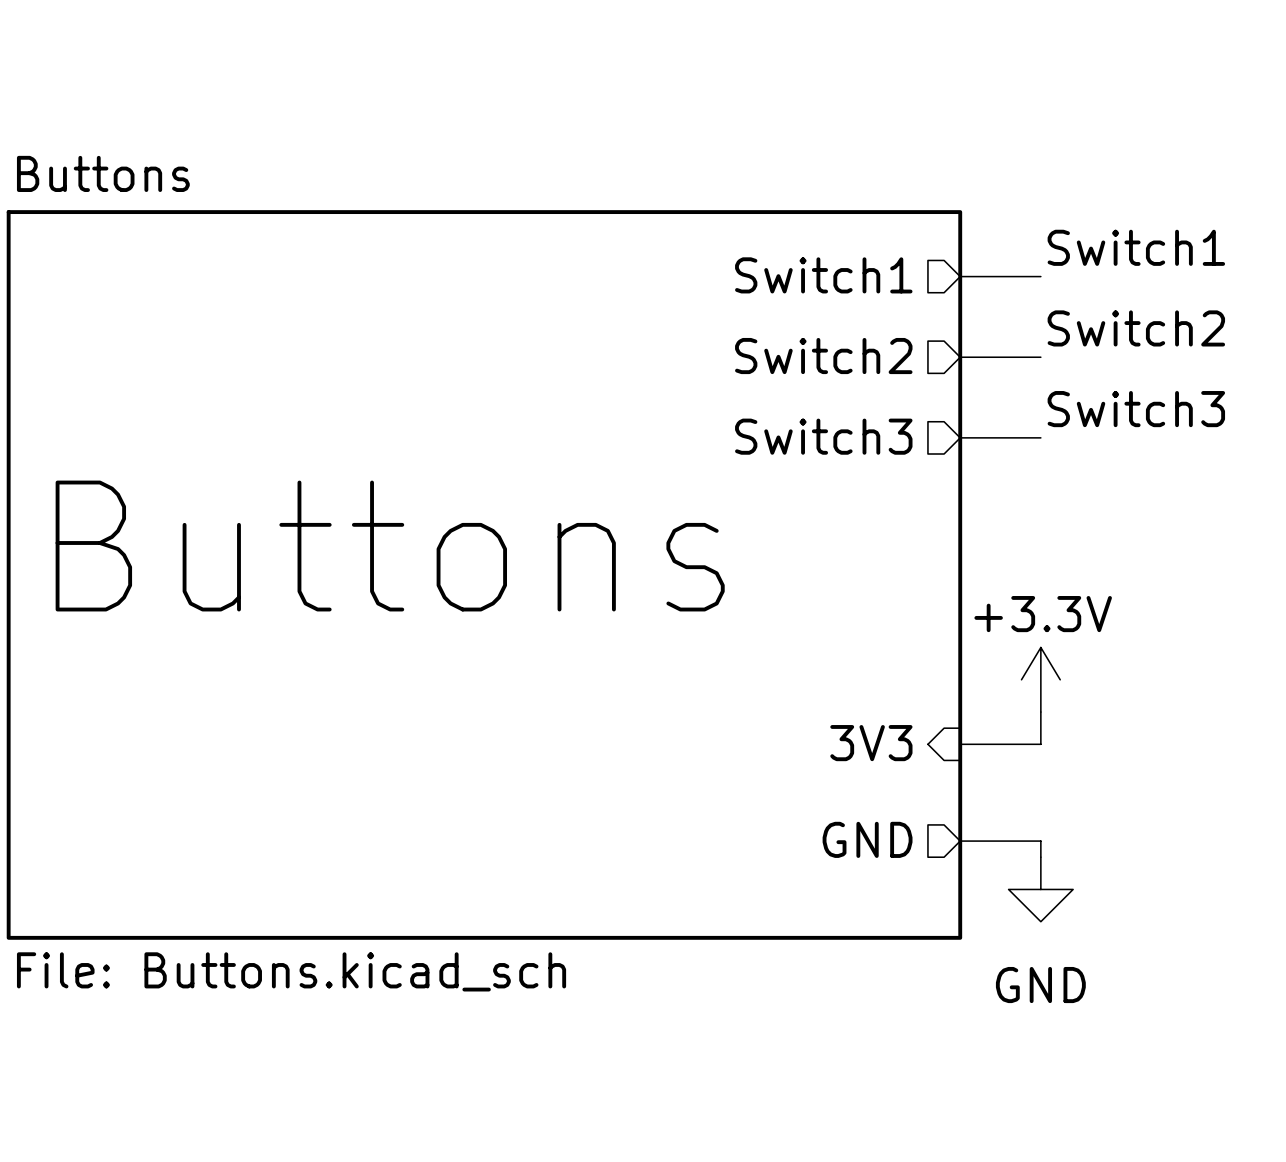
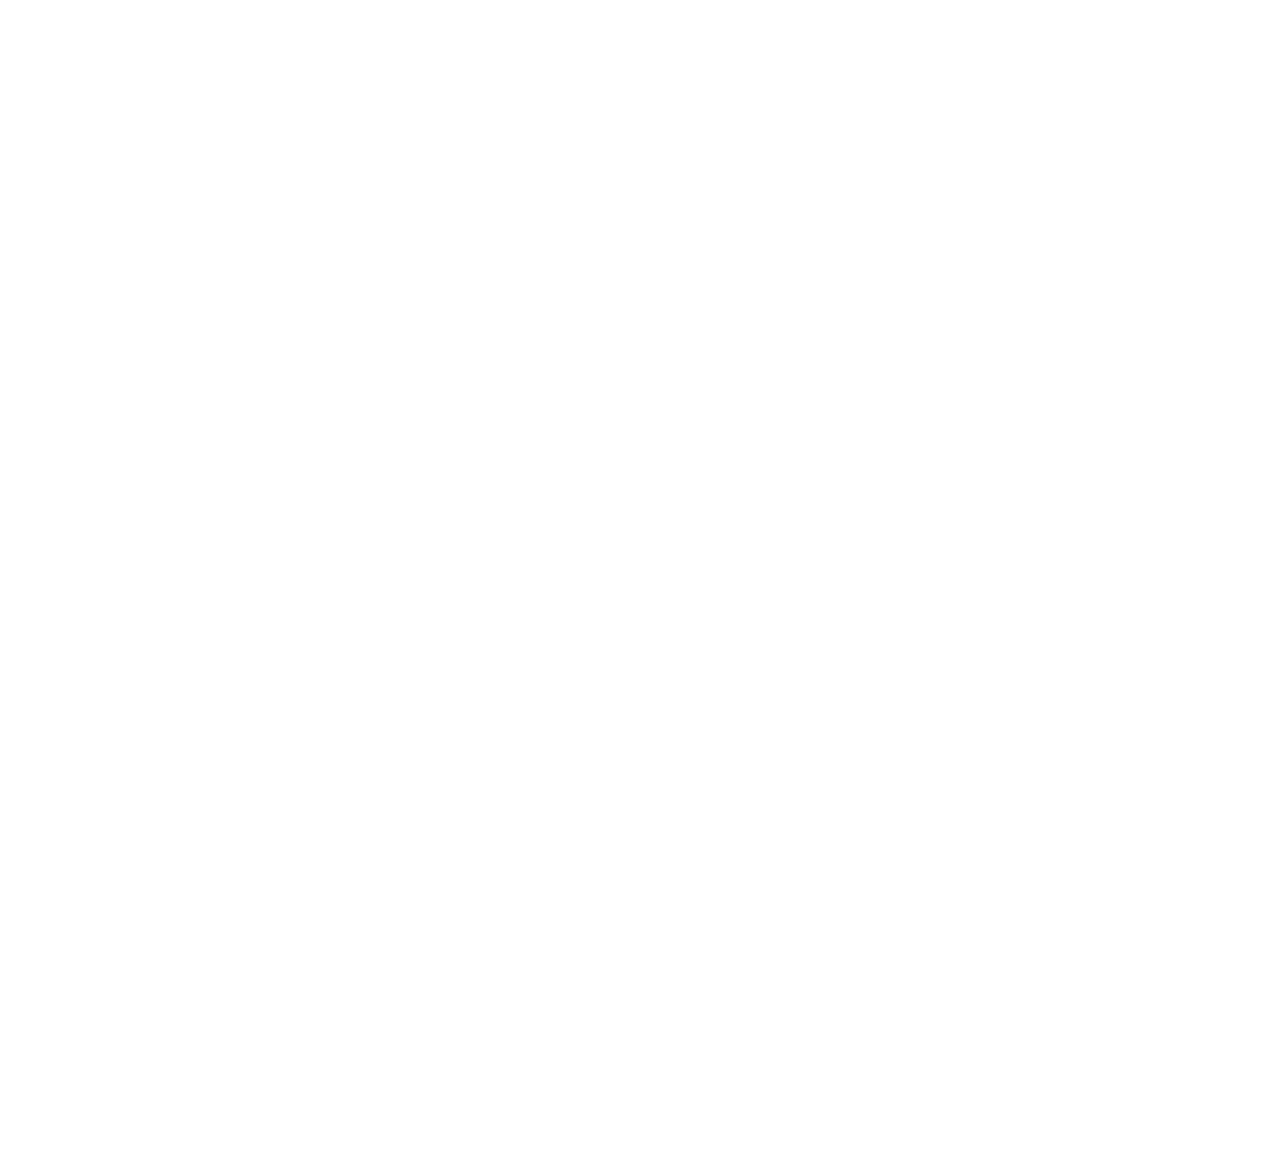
label: Switch1 (1136, 247) -> none
sheet pin: Switch1 (823, 275) -> none
wire: (960, 276) (1040, 276) -> none
label: Switch2 (1136, 328) -> none
sheet pin: Switch2 (823, 356) -> none
wire: (960, 357) (1040, 357) -> none
label: Switch3 (1136, 409) -> none
sheet pin: Switch3 (823, 436) -> none
wire: (960, 437) (1040, 437) -> none
text: Buttons (390, 546) -> none
sheet Buttons: File: Buttons.kicad_sch (484, 574) -> none
power symbol: +3.3V (1040, 679) -> none
wire: (1040, 712) (1040, 744) (960, 744) -> none
sheet pin: 3V3 (871, 743) -> none
sheet pin: GND (867, 839) -> none
wire: (960, 841) (1040, 841) (1040, 857) -> none
power symbol: GND (1040, 889) -> none

